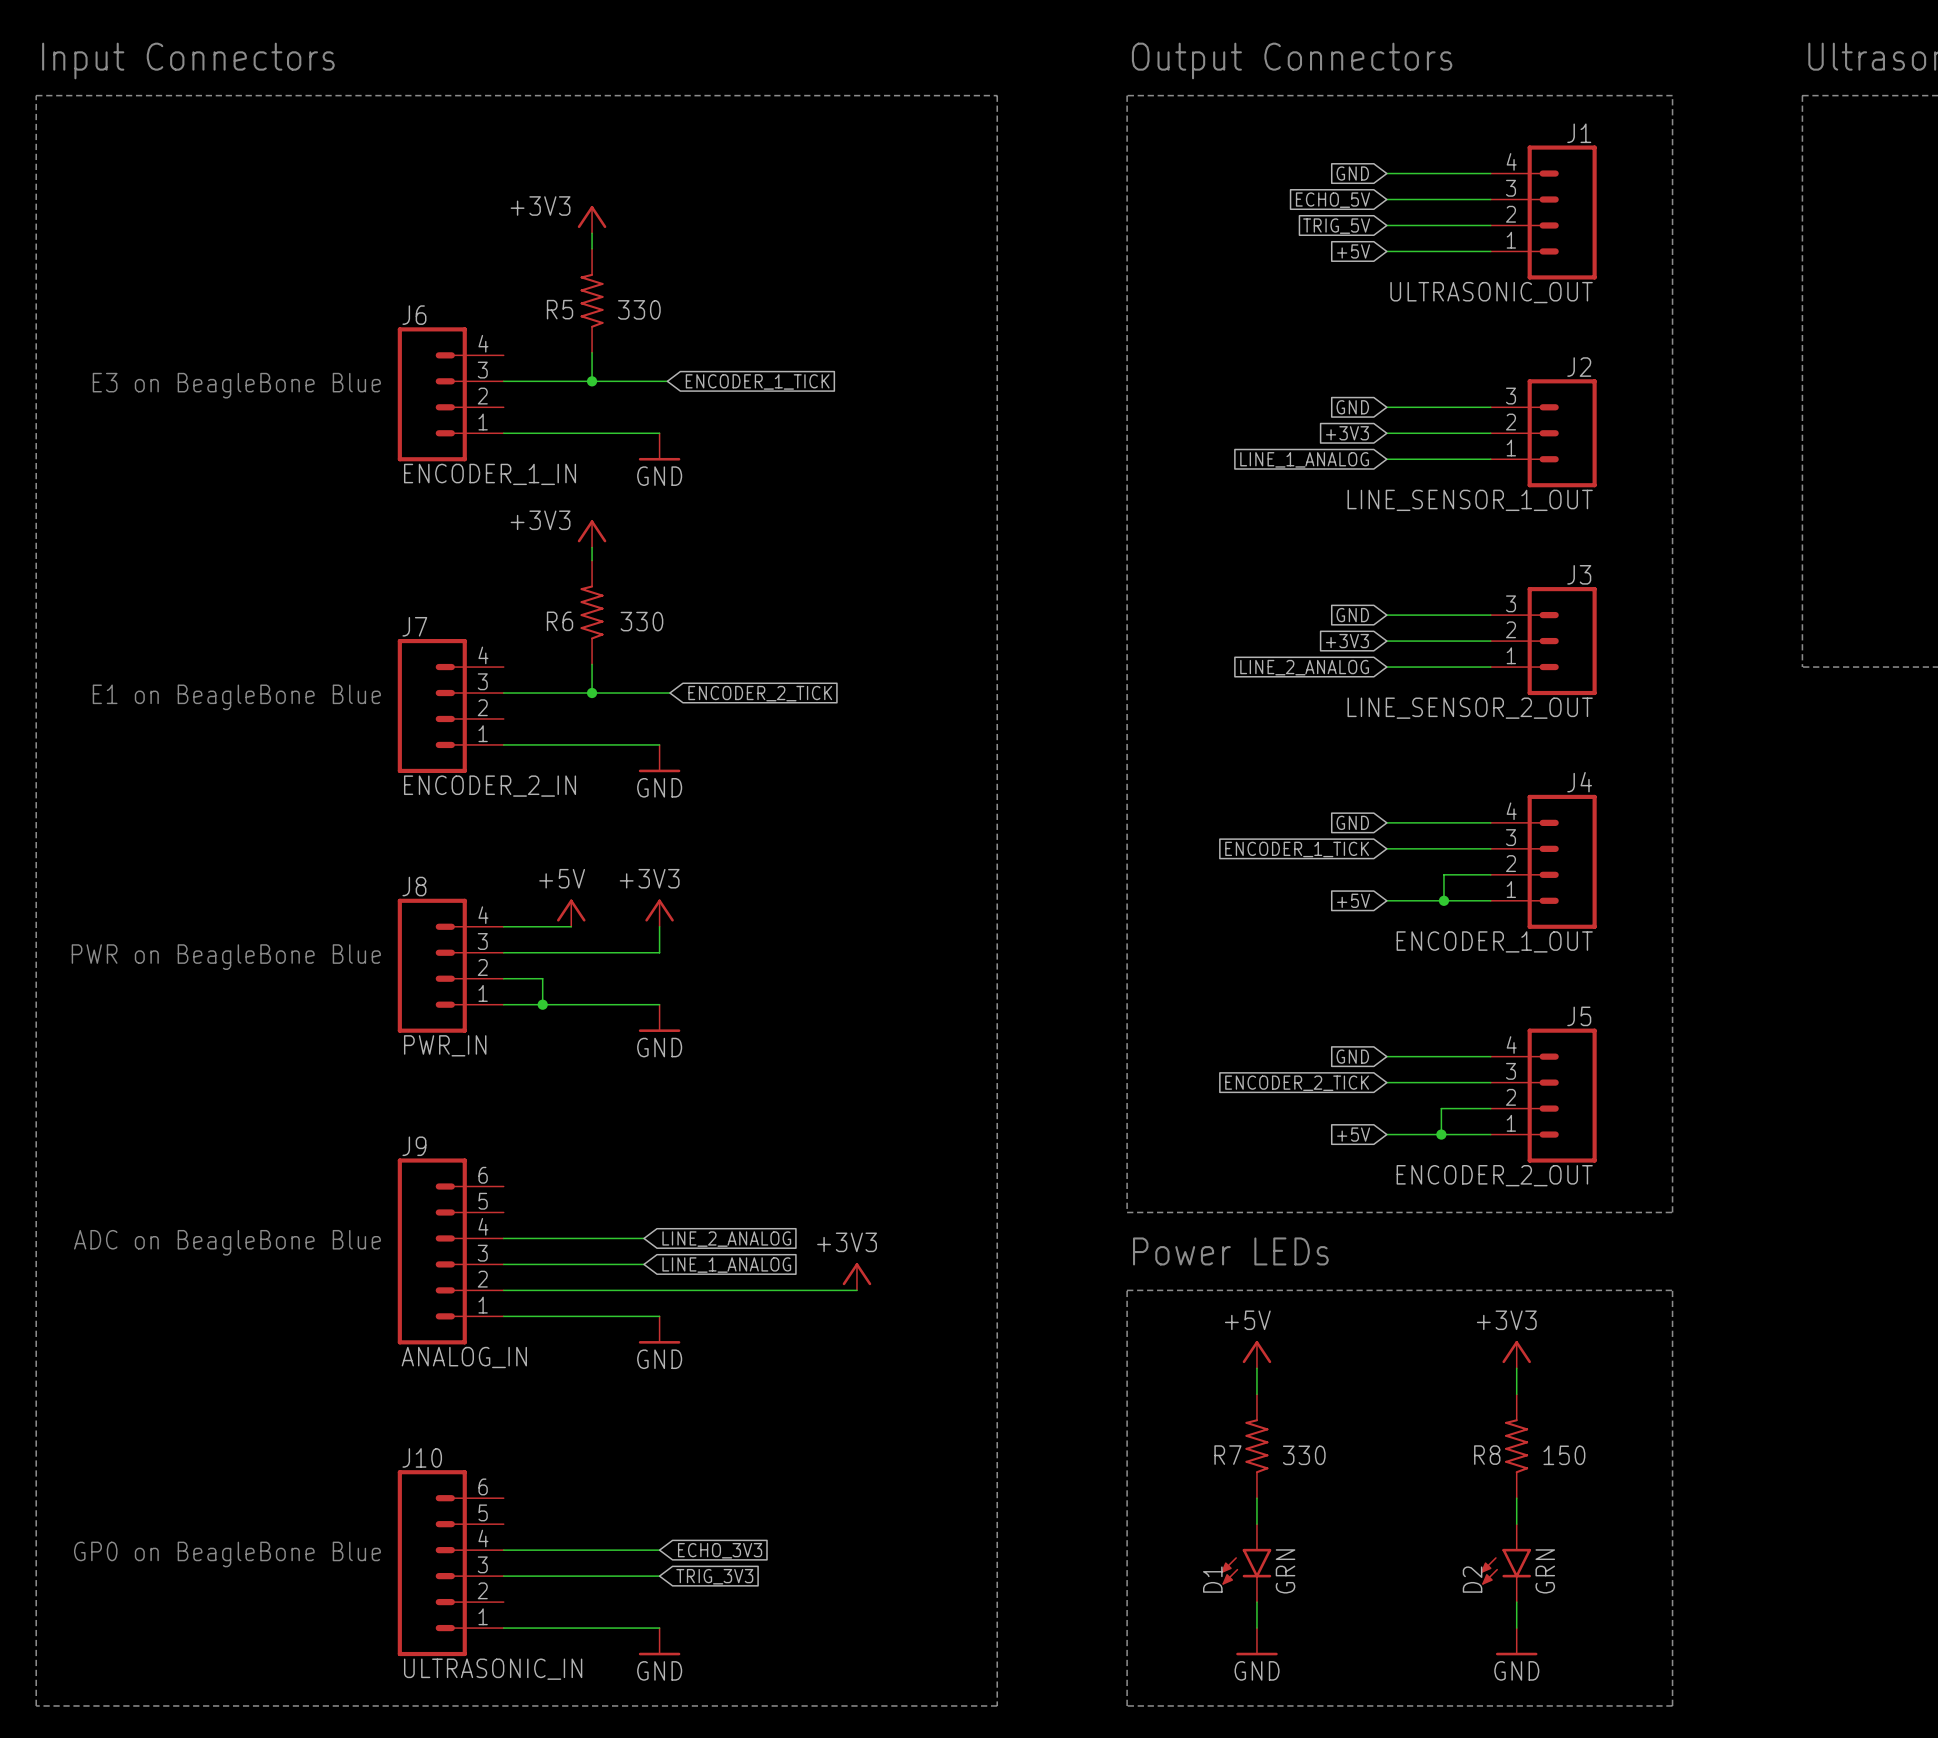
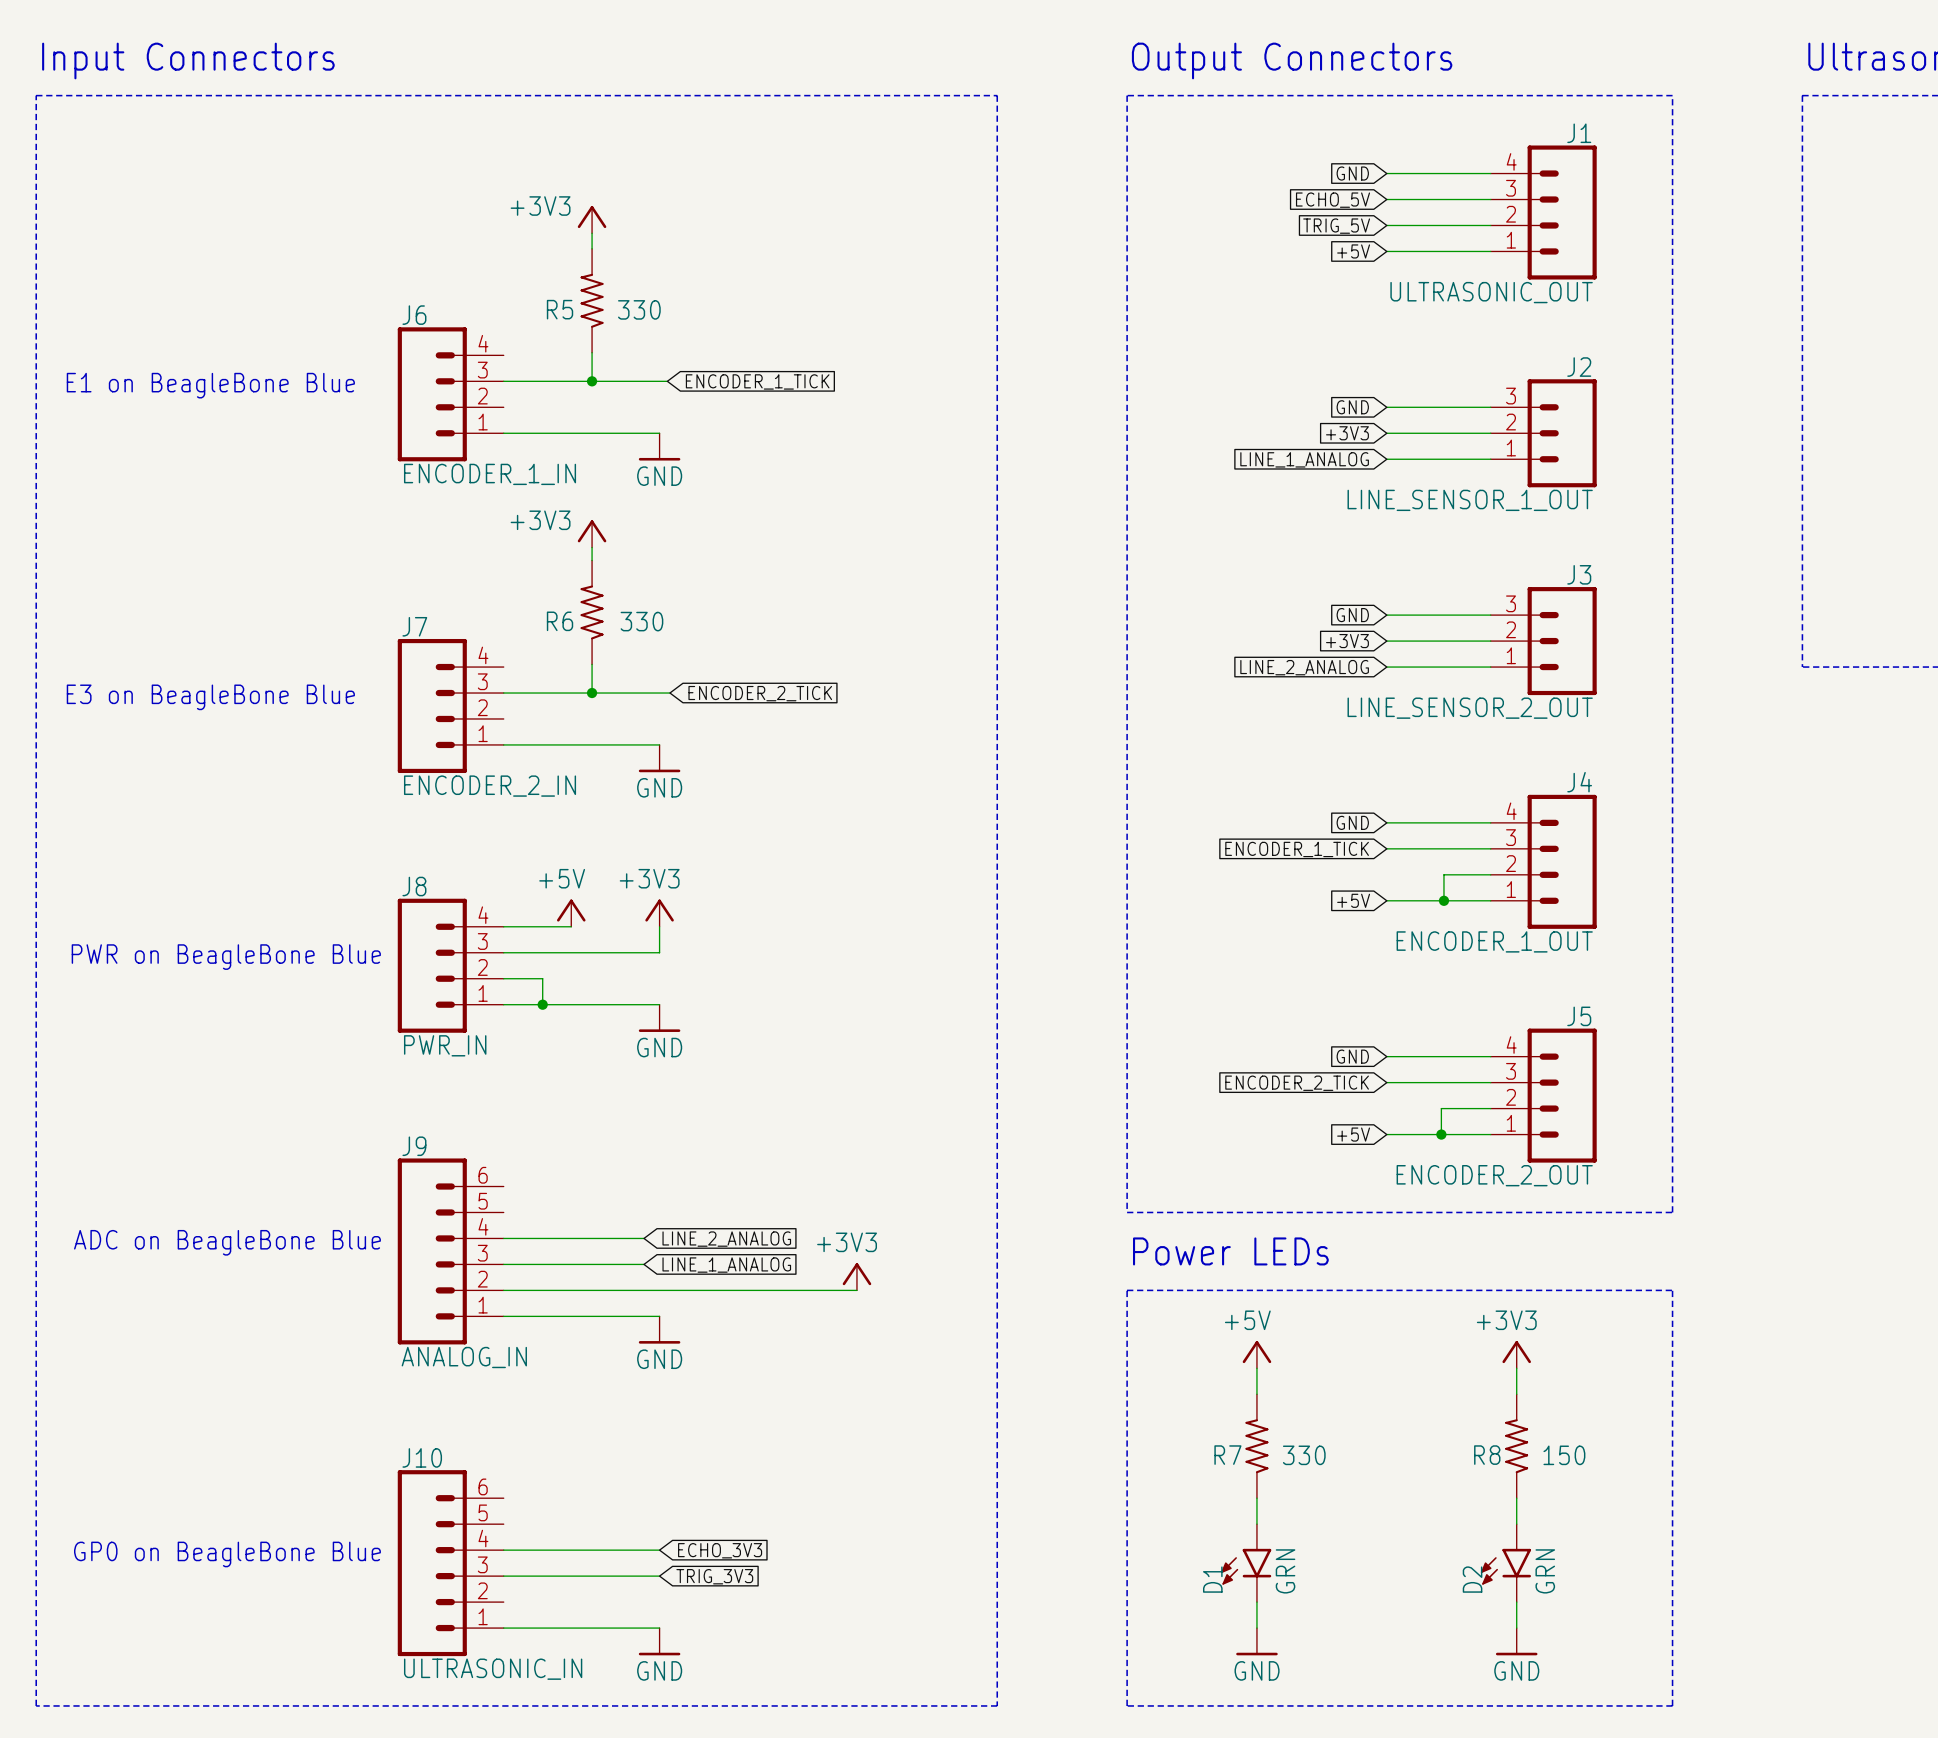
text: E3 on BeagleBone Blue (236, 385) -> E1 on BeagleBone Blue (210, 385)
text: E1 on BeagleBone Blue (236, 697) -> E3 on BeagleBone Blue (210, 697)

